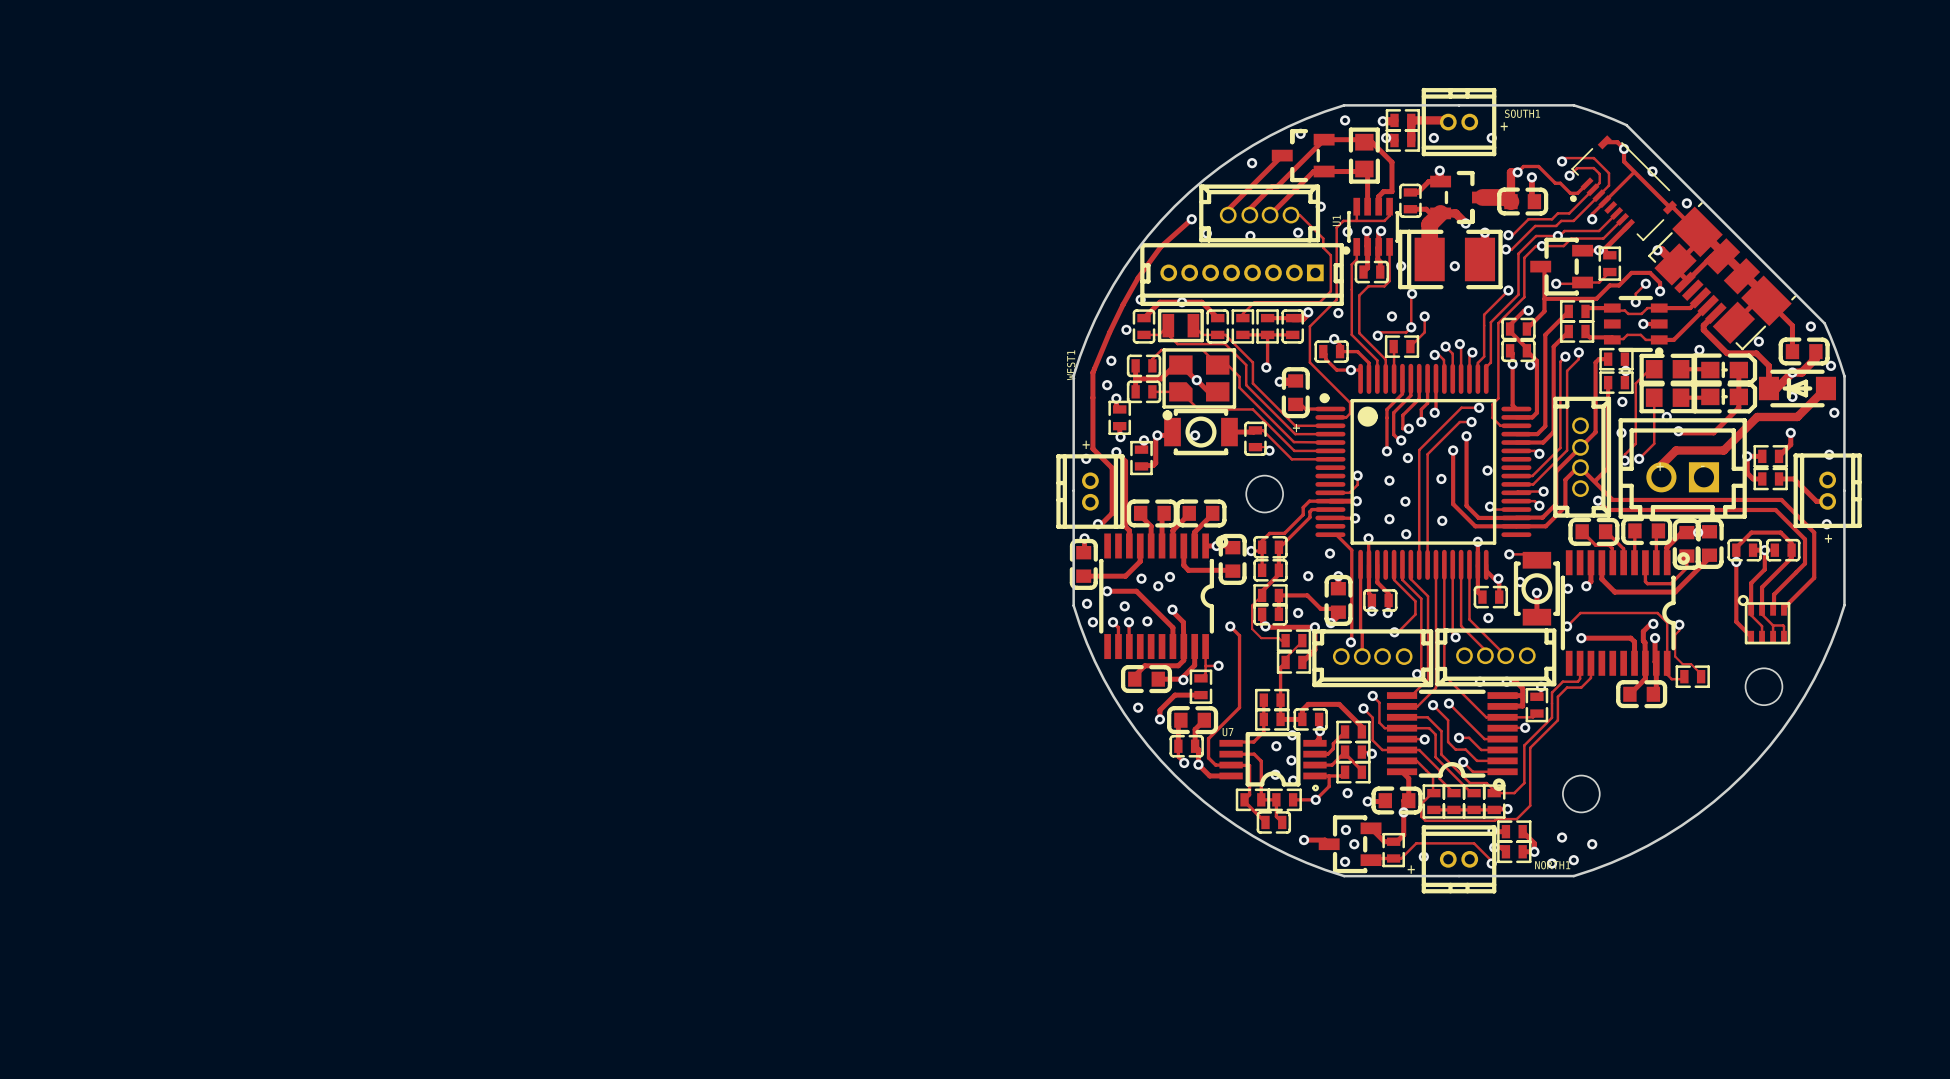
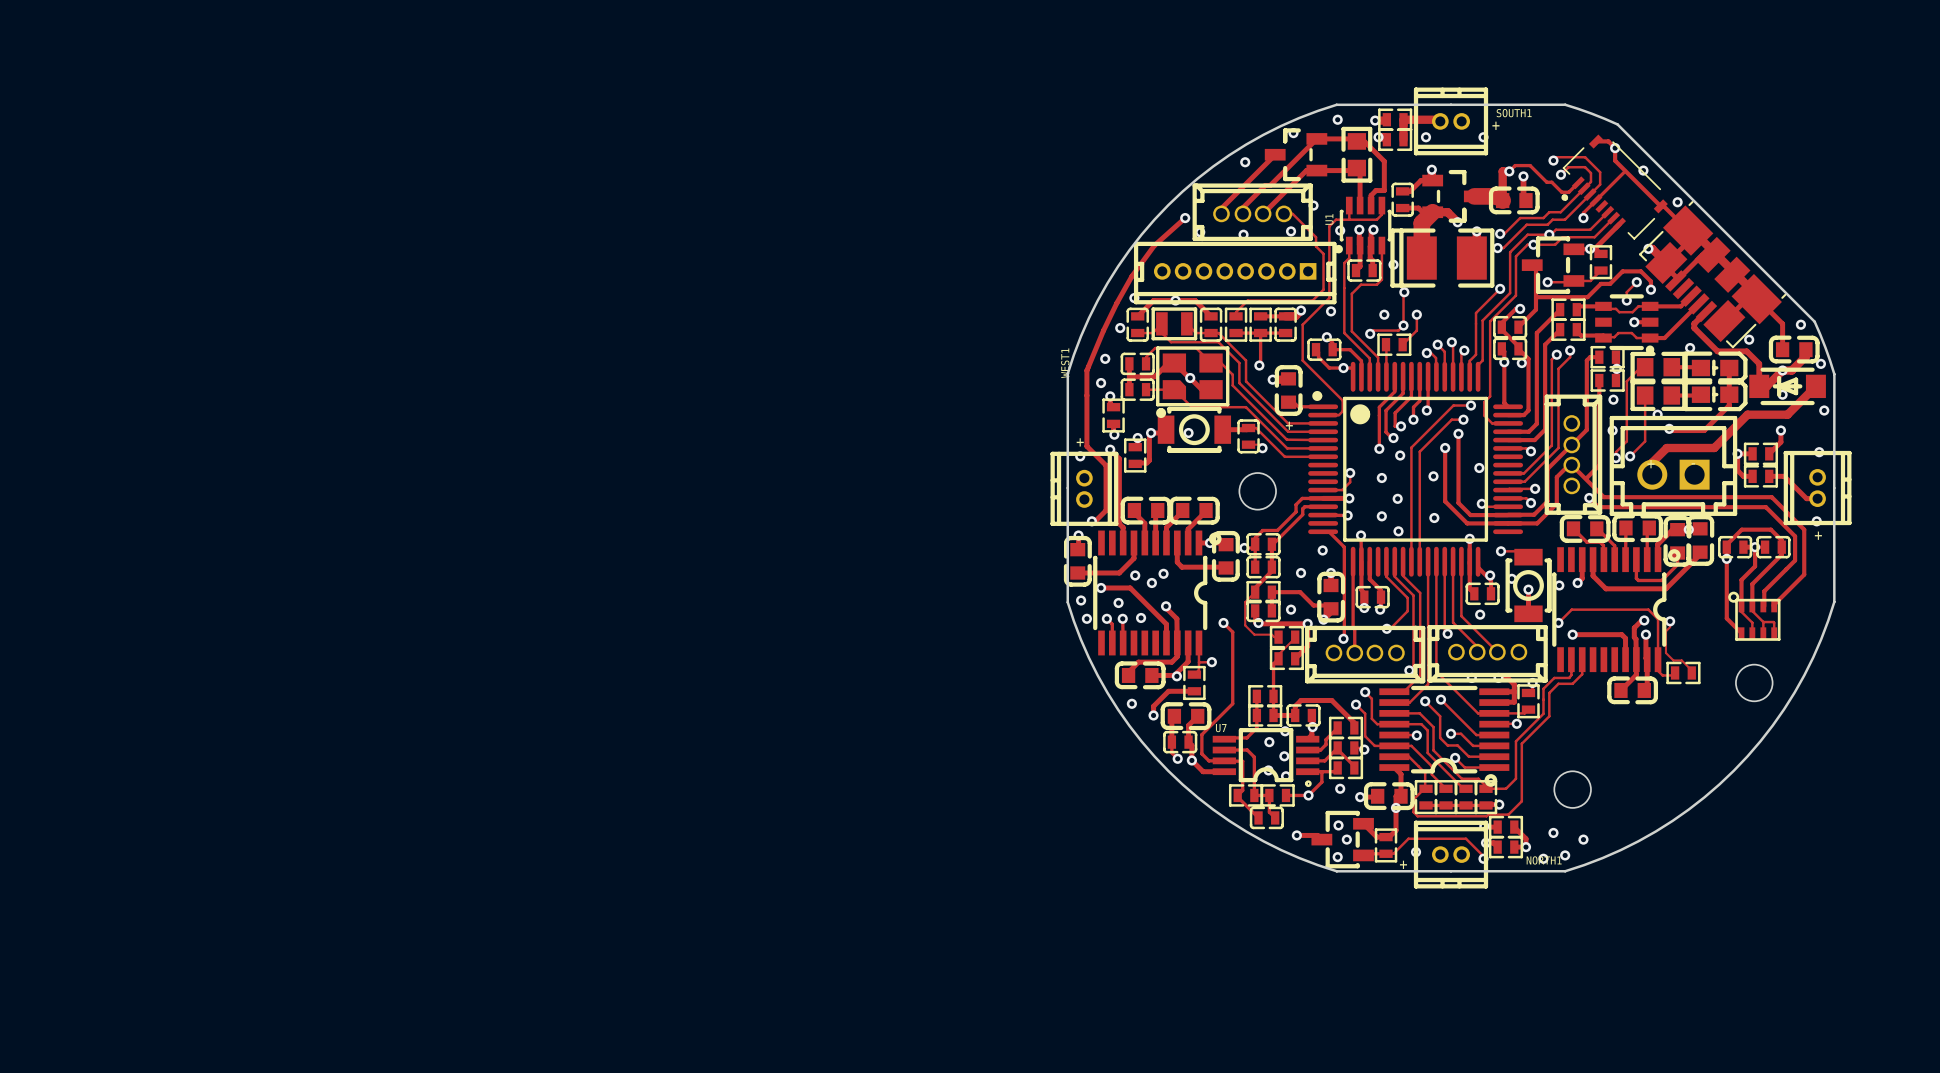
via: (1454, 266) -> none

